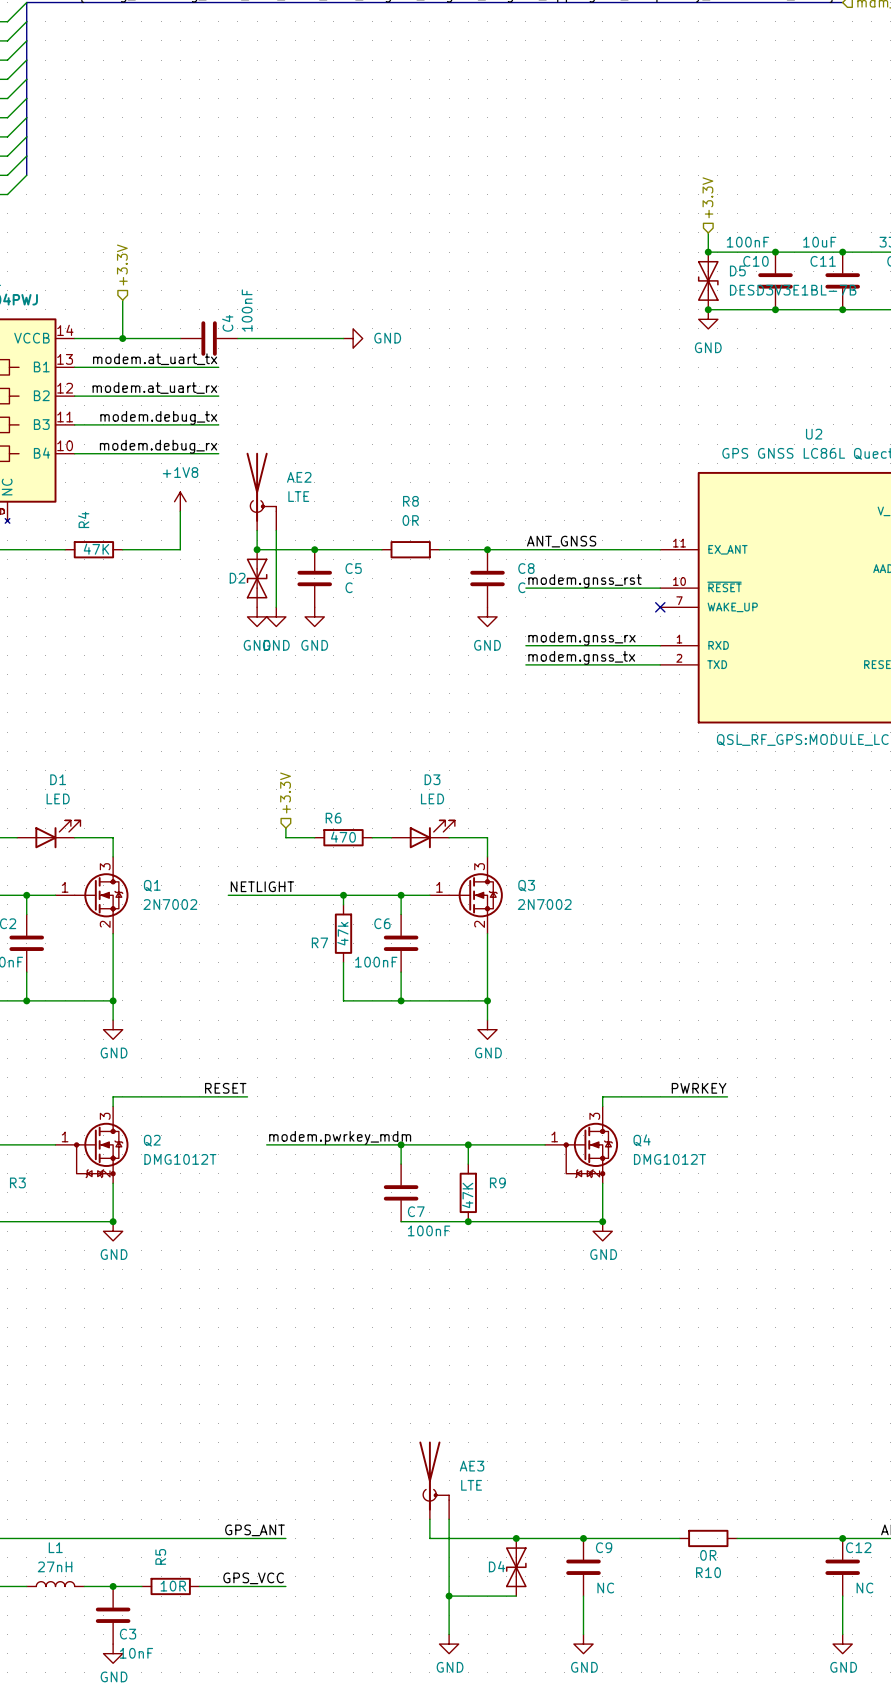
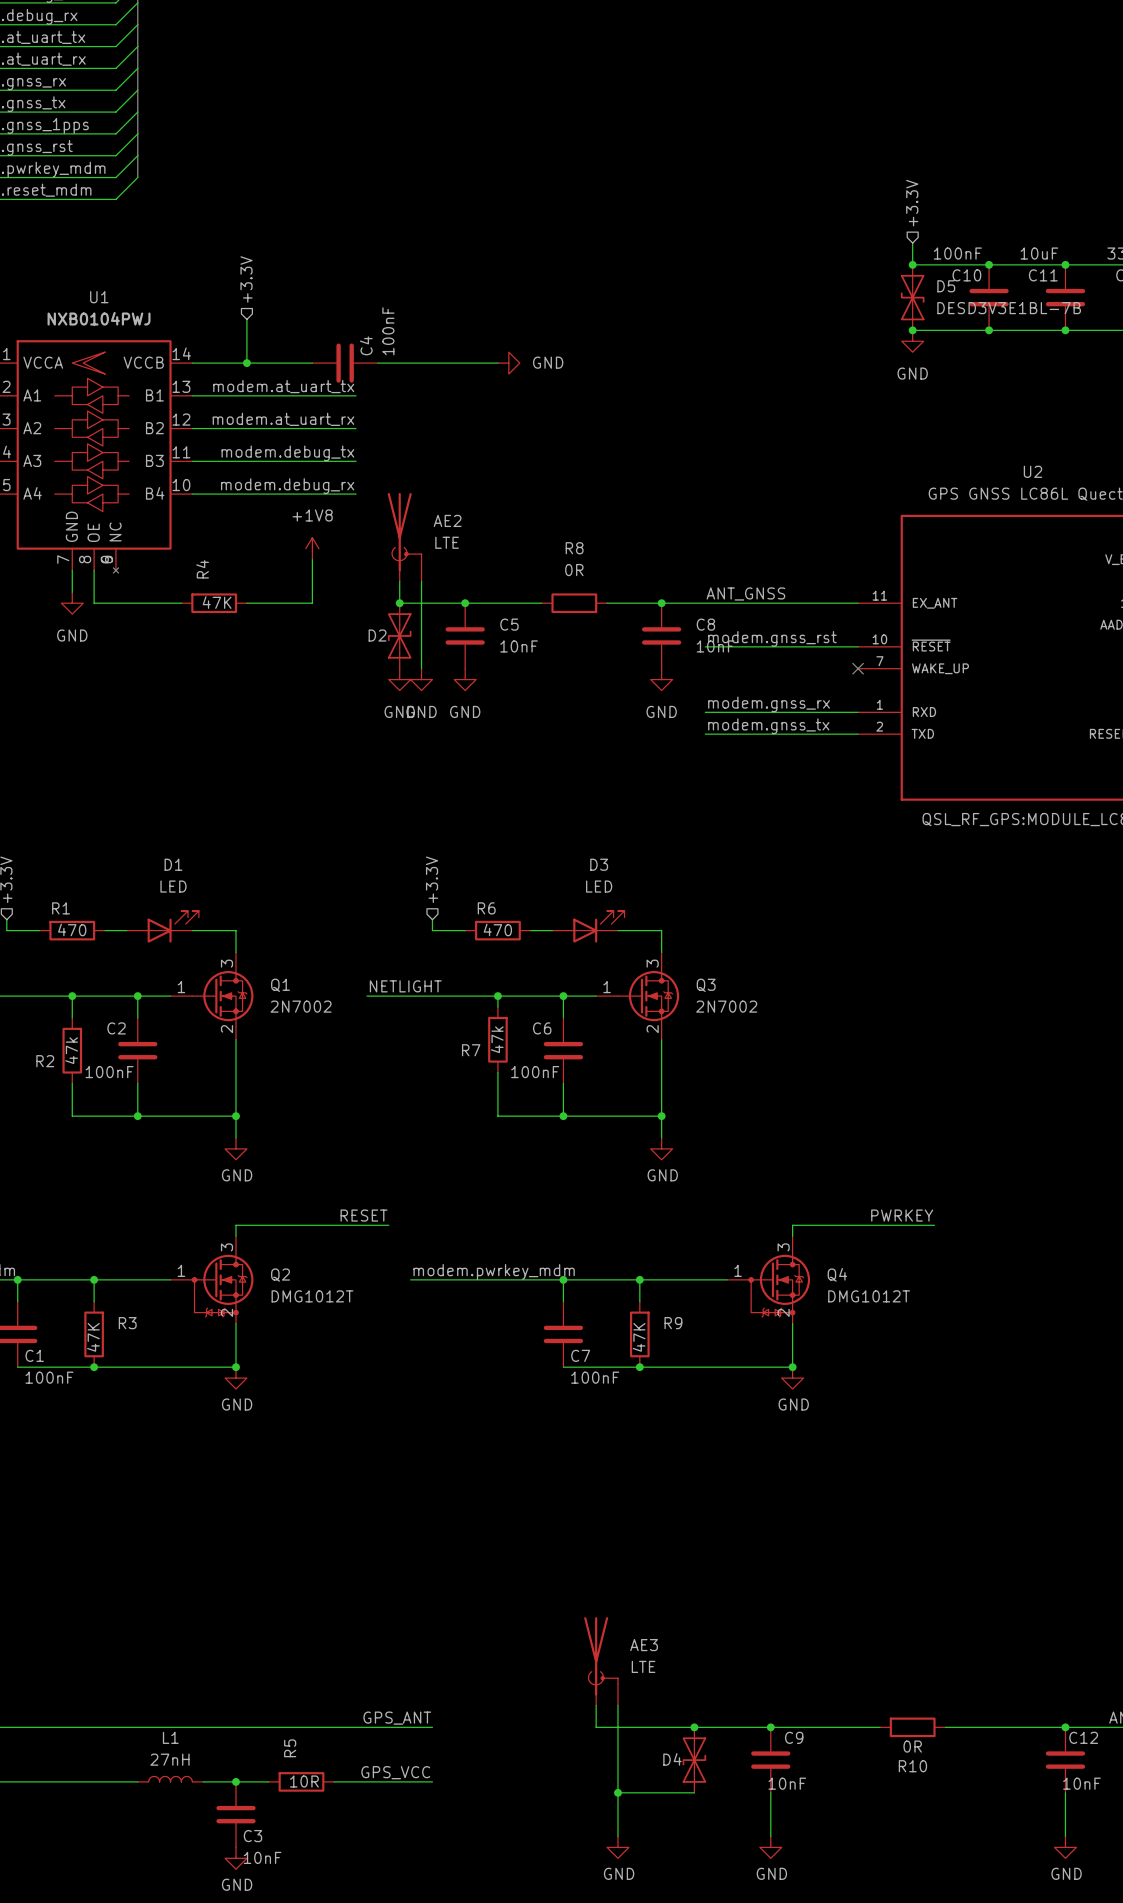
C5 value: C (349, 587) -> 10nF (519, 646)
C8 value: C (521, 587) -> 10nF (715, 646)
C9 value: NC (605, 1588) -> 10nF (787, 1783)
C12 value: NC (864, 1588) -> 10nF (1081, 1783)

